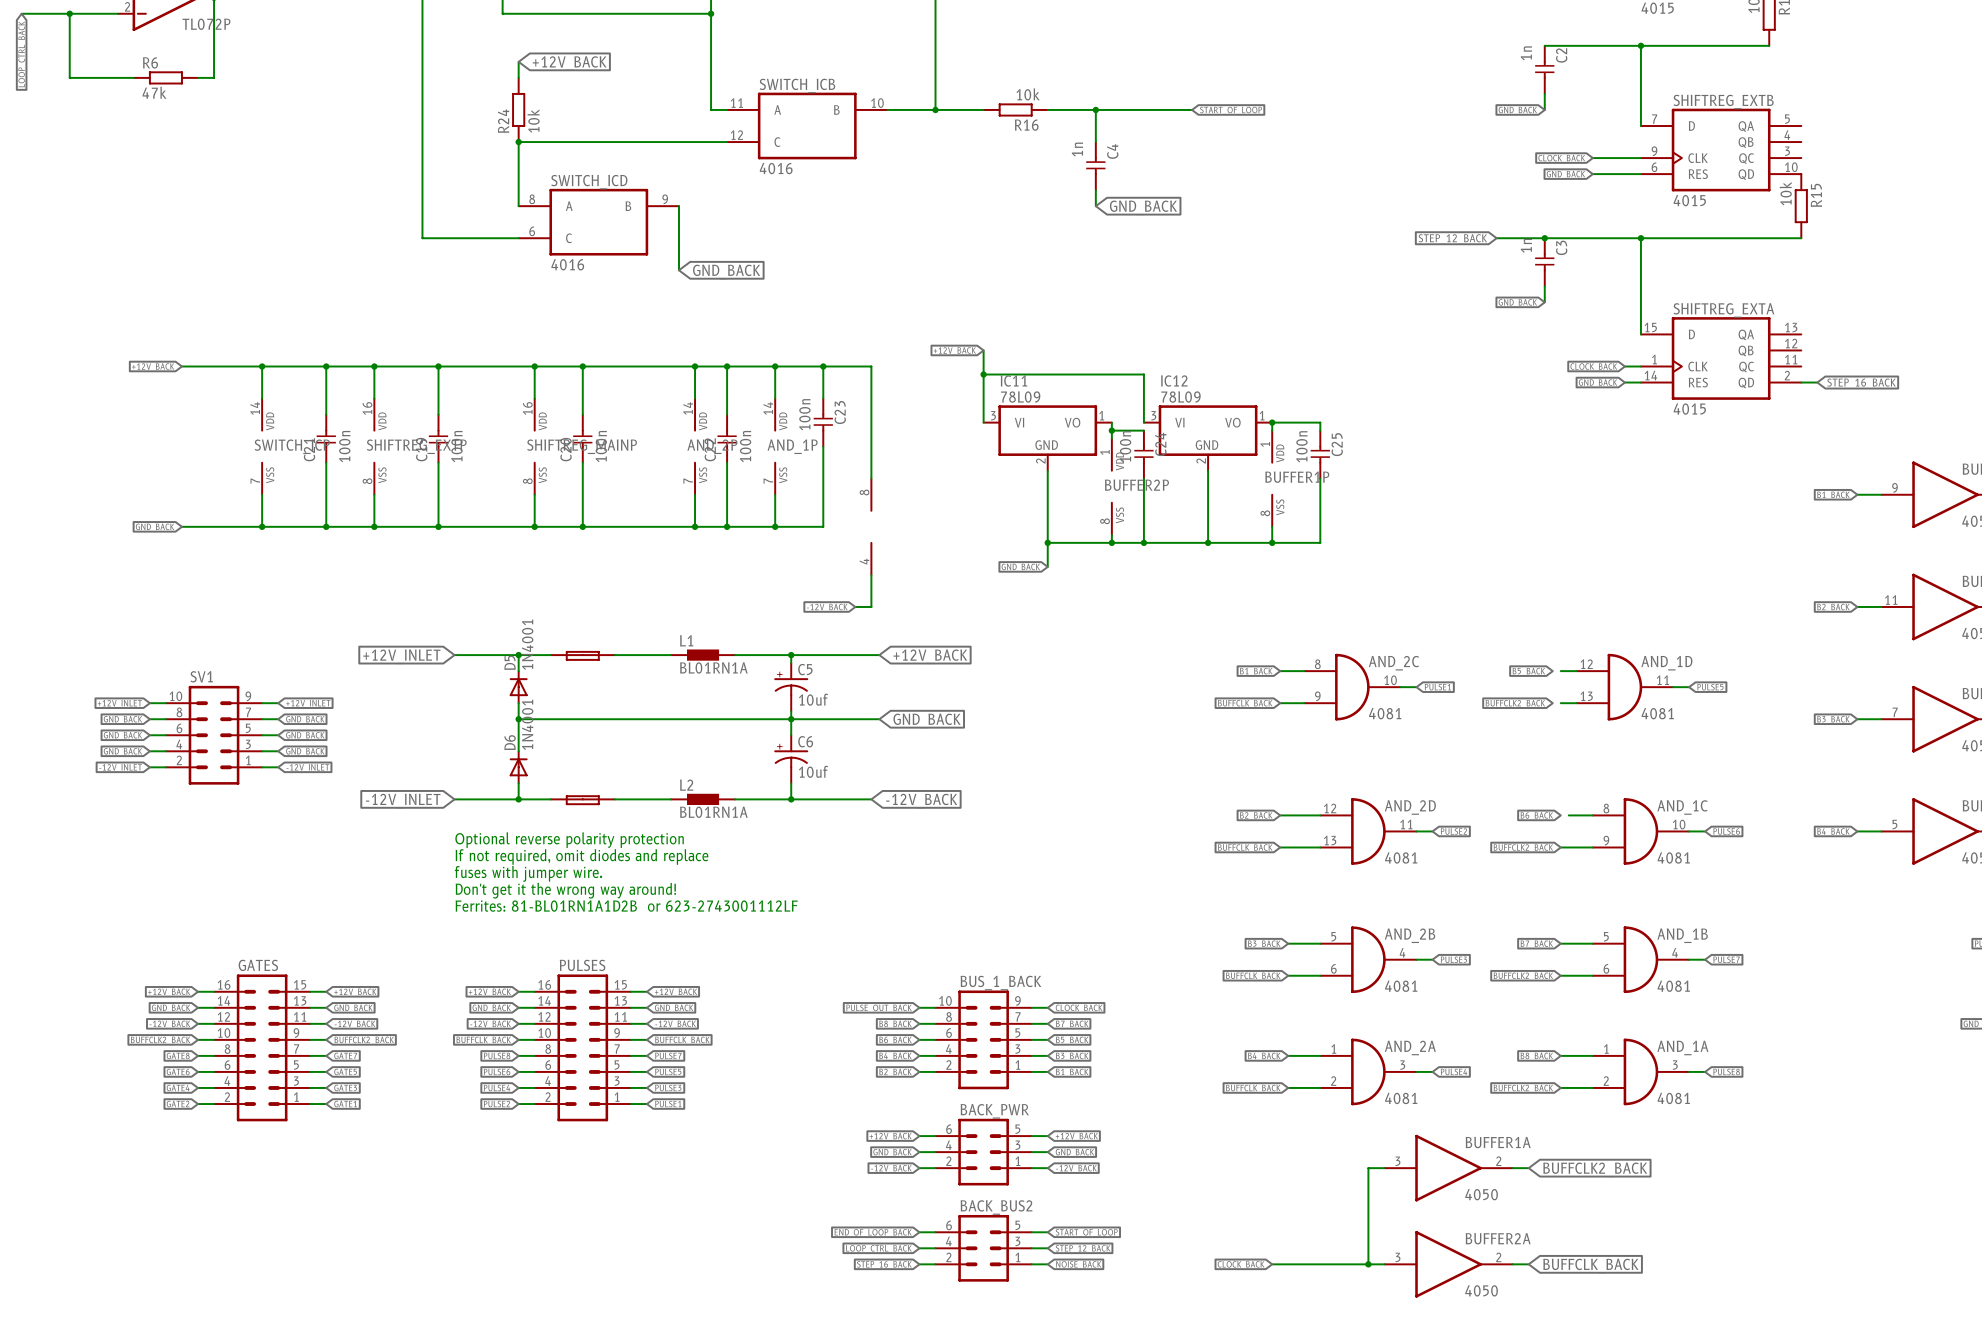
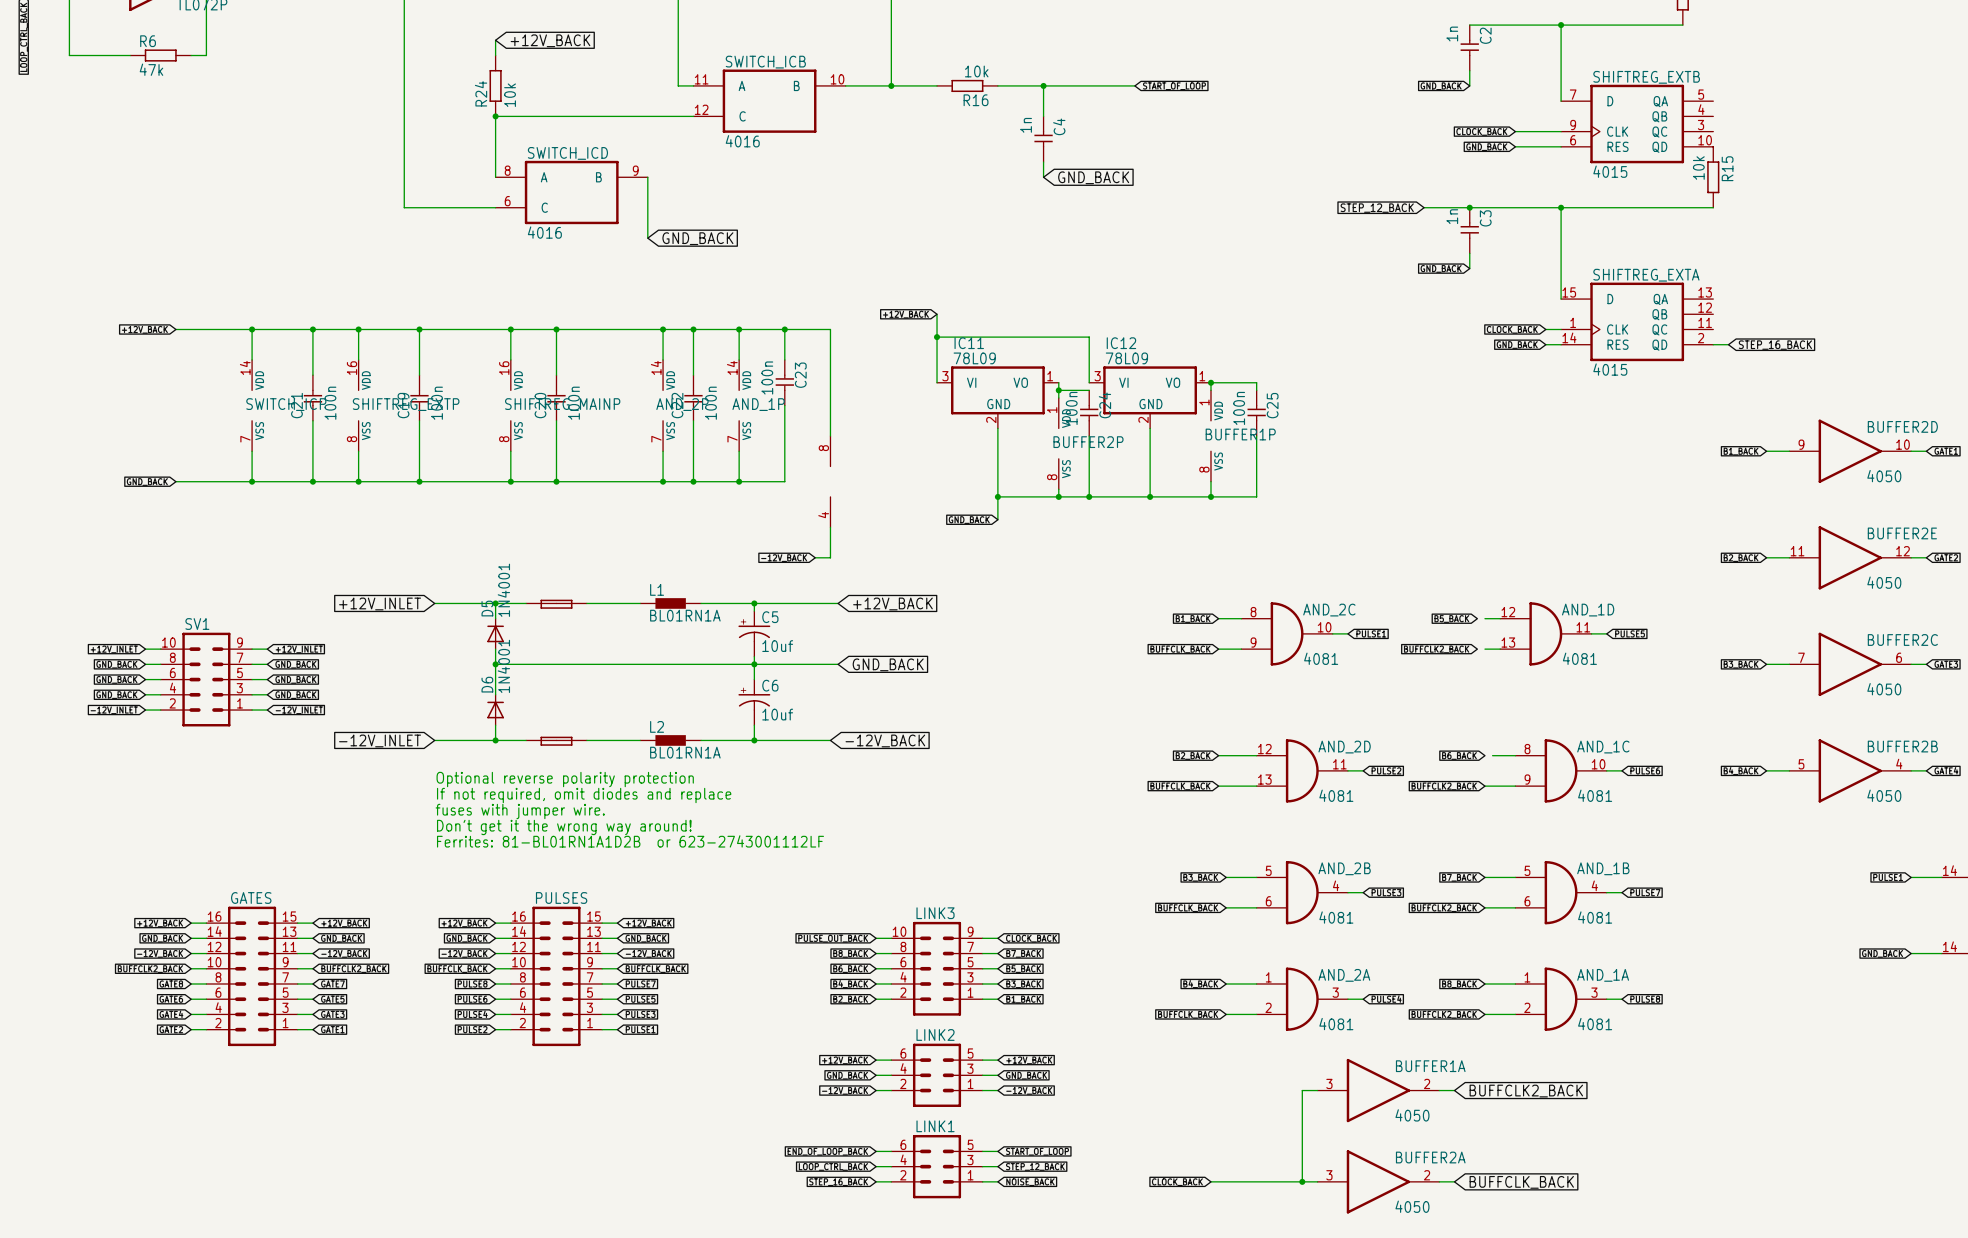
BUS_1_BACK name: BUS_1_BACK (1000, 983) -> LINK3 (935, 913)
BACK_PWR name: BACK_PWR (994, 1111) -> LINK2 (935, 1034)
BACK_BUS2 name: BACK_BUS2 (996, 1207) -> LINK1 (935, 1126)

